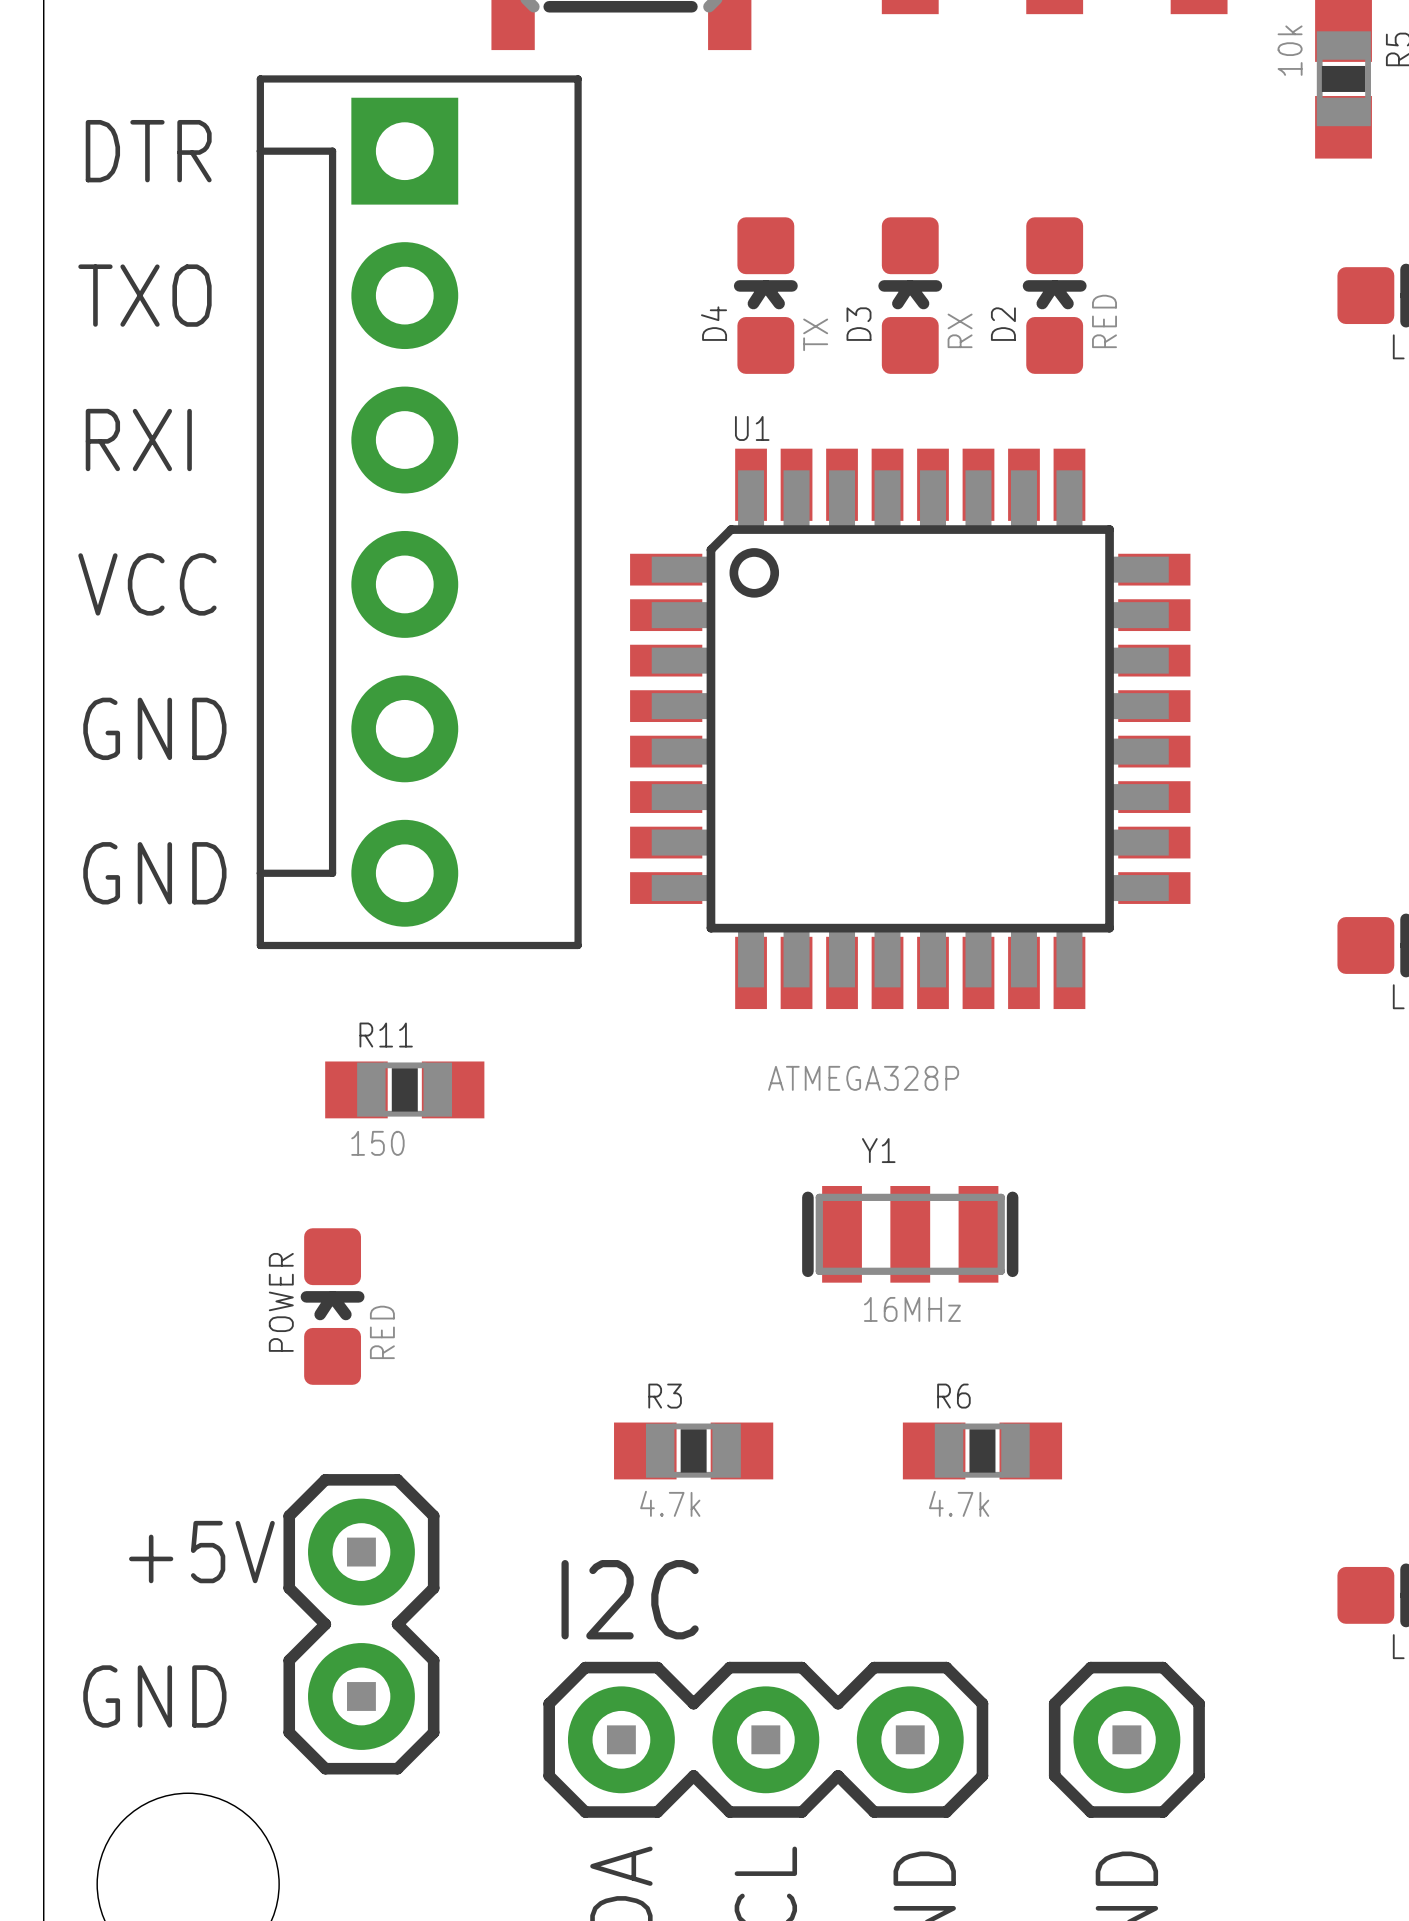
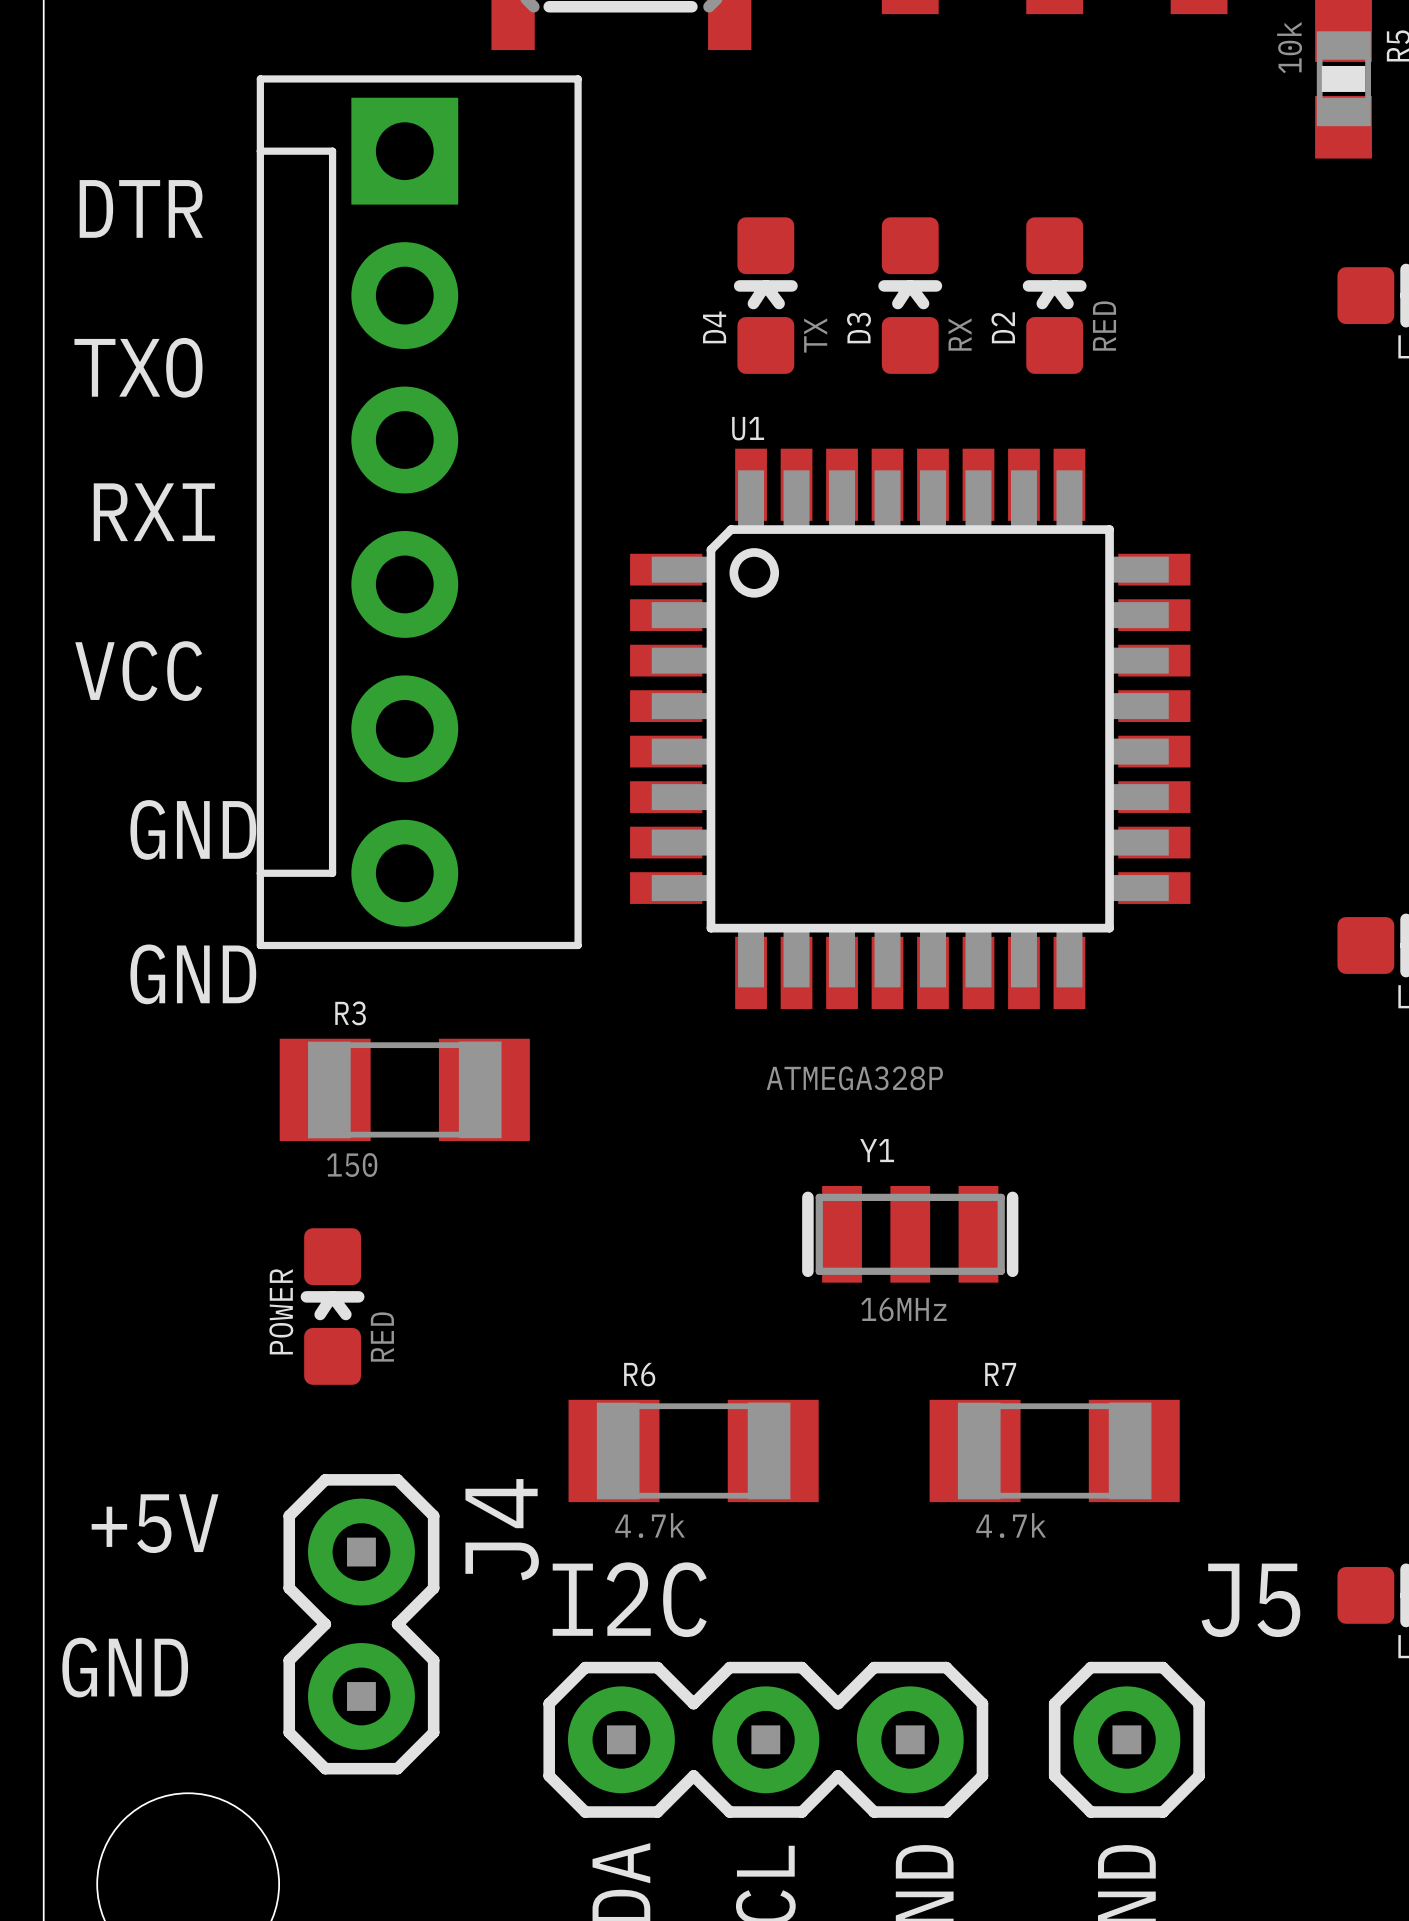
text position: DTR (148, 151) -> DTR (141, 208)
text position: TXO (144, 295) -> TXO (138, 367)
text position: RXI (138, 440) -> RXI (154, 512)
text position: VCC (147, 584) -> VCC (138, 671)
text: GND (154, 728) -> none
text: none -> GND (193, 829)
text: GND (154, 873) -> none
text: none -> GND (193, 974)
R11: 150 (404, 1089) -> none
R3 footprint: [614, 1422, 774, 1480] -> [279, 1038, 530, 1142]
R6 footprint: [902, 1422, 1063, 1480] -> [568, 1399, 819, 1503]
R7: none -> 4.7k (1054, 1450)
R3 value: 4.7k (670, 1503) -> 150 (352, 1165)
J4 name: none -> J4 (502, 1529)
text position: +5V (201, 1552) -> +5V (155, 1523)
J5 name: none -> J5 (1250, 1600)
text position: GND (154, 1696) -> GND (125, 1667)

